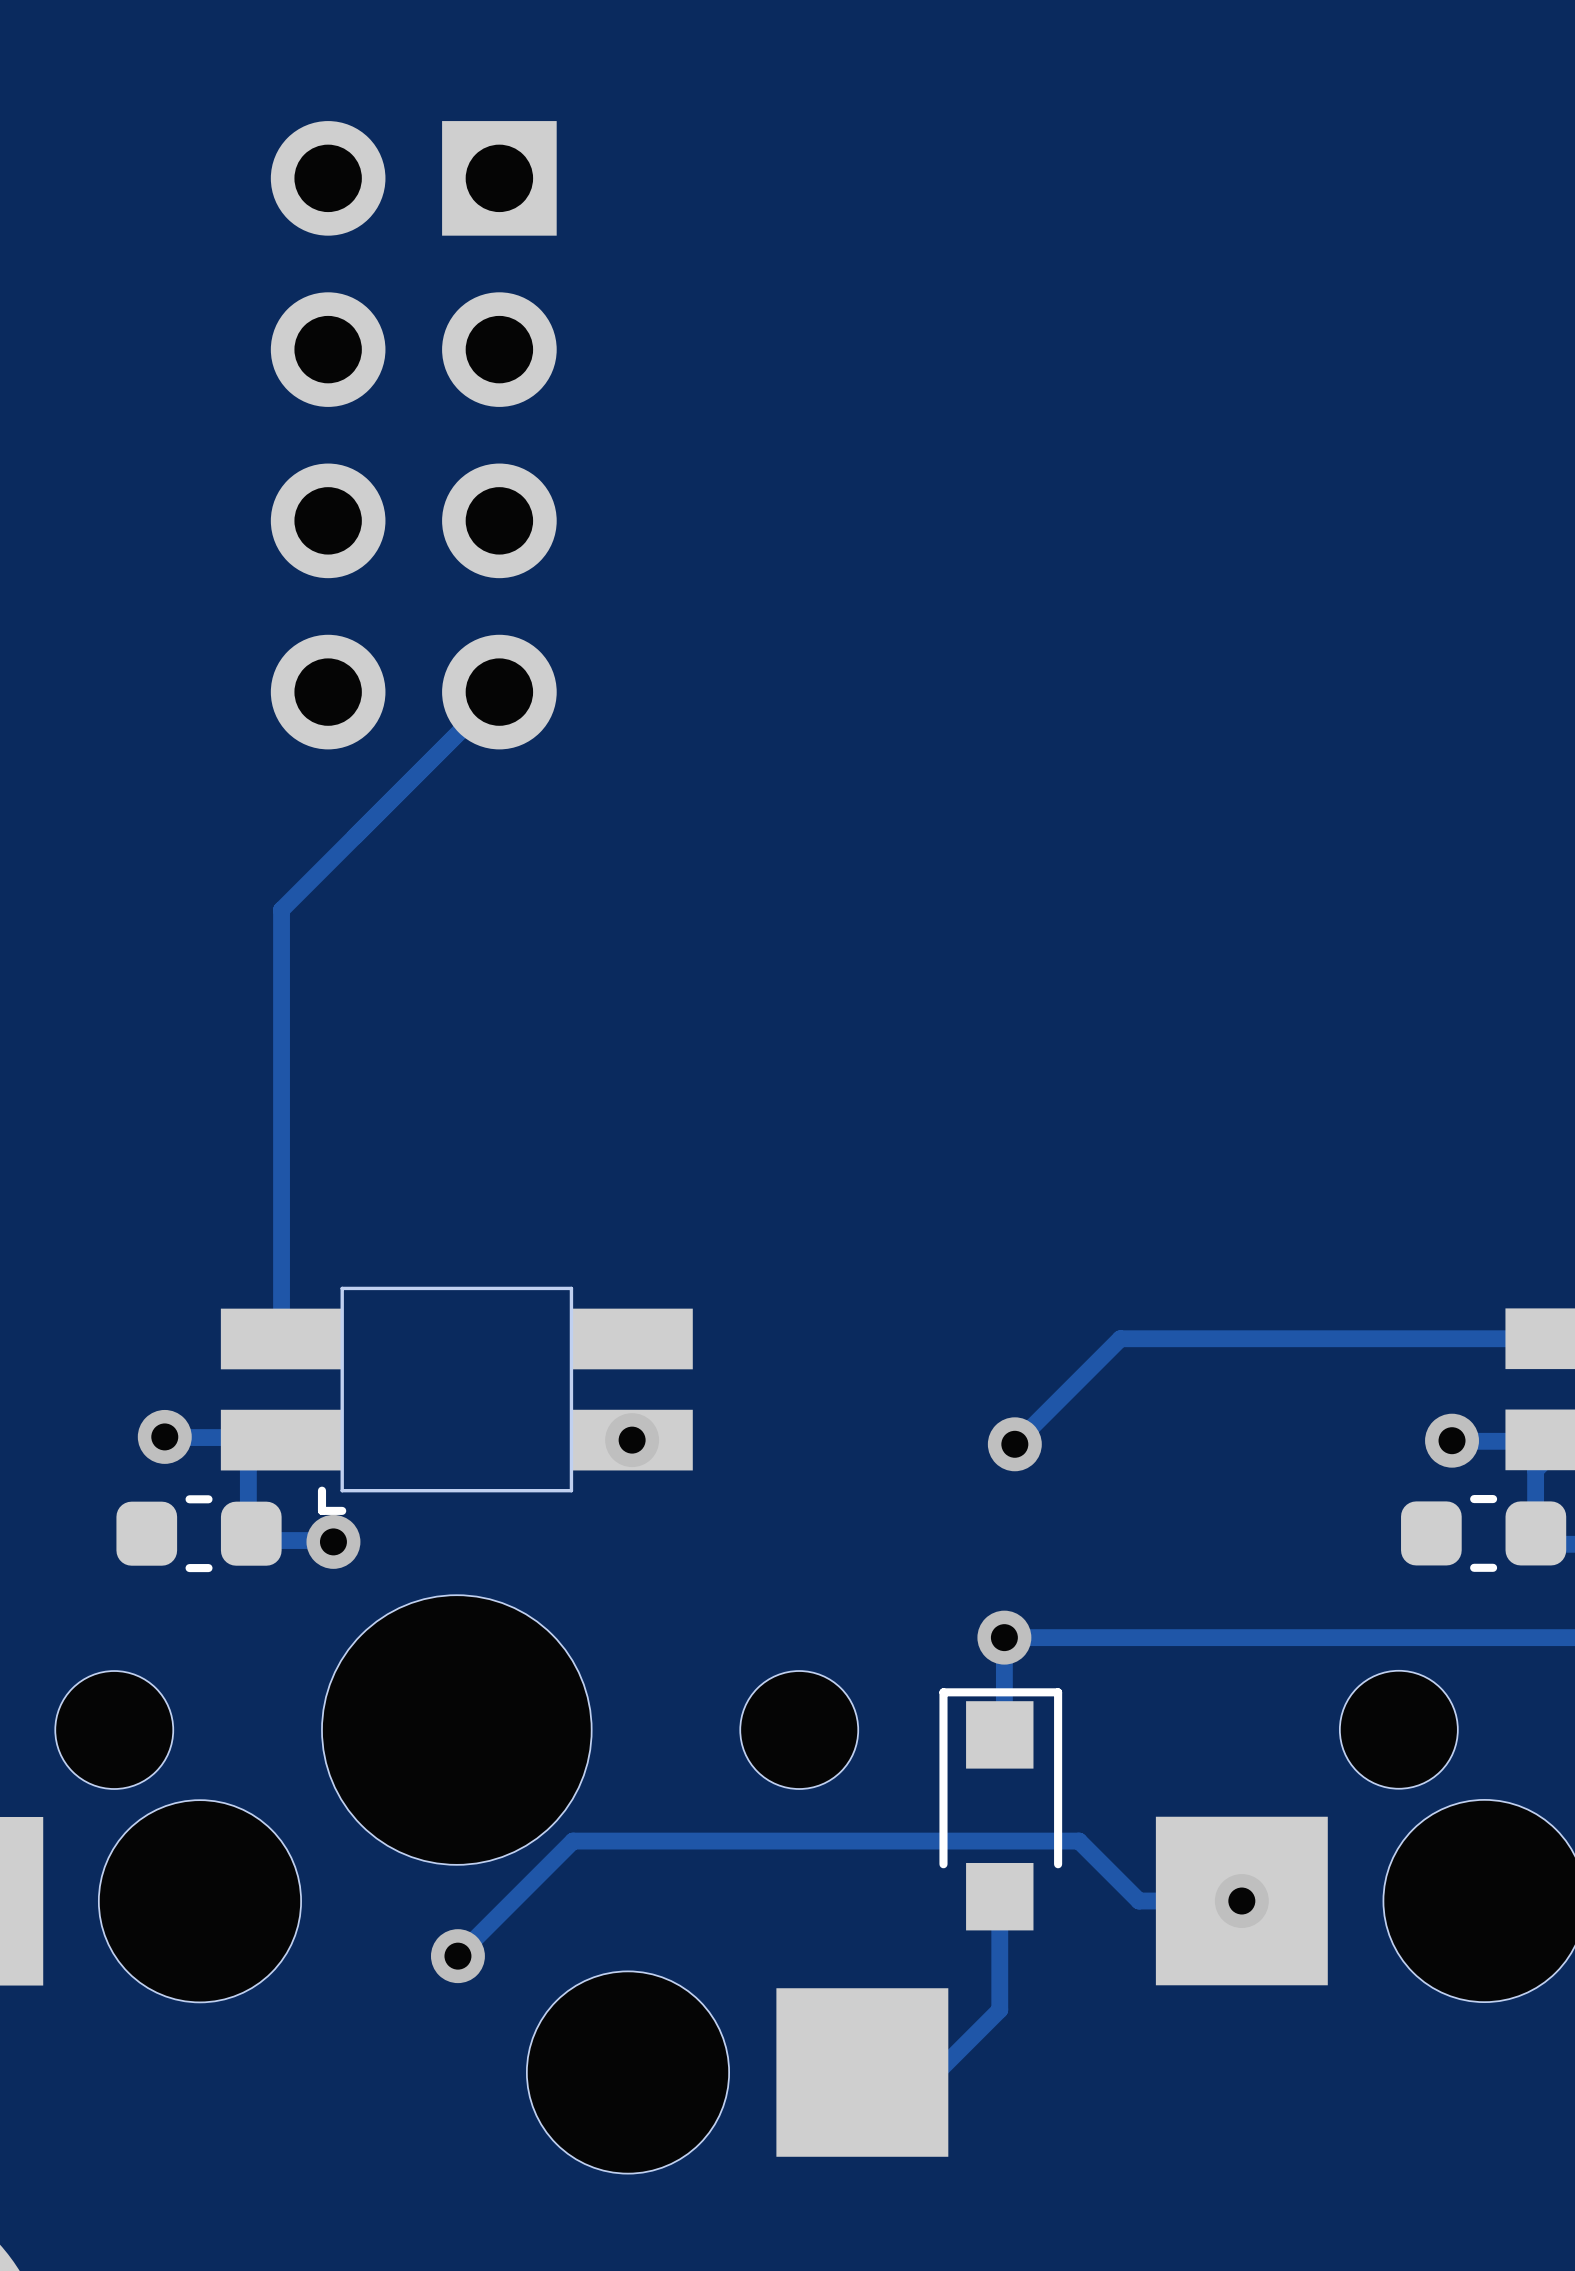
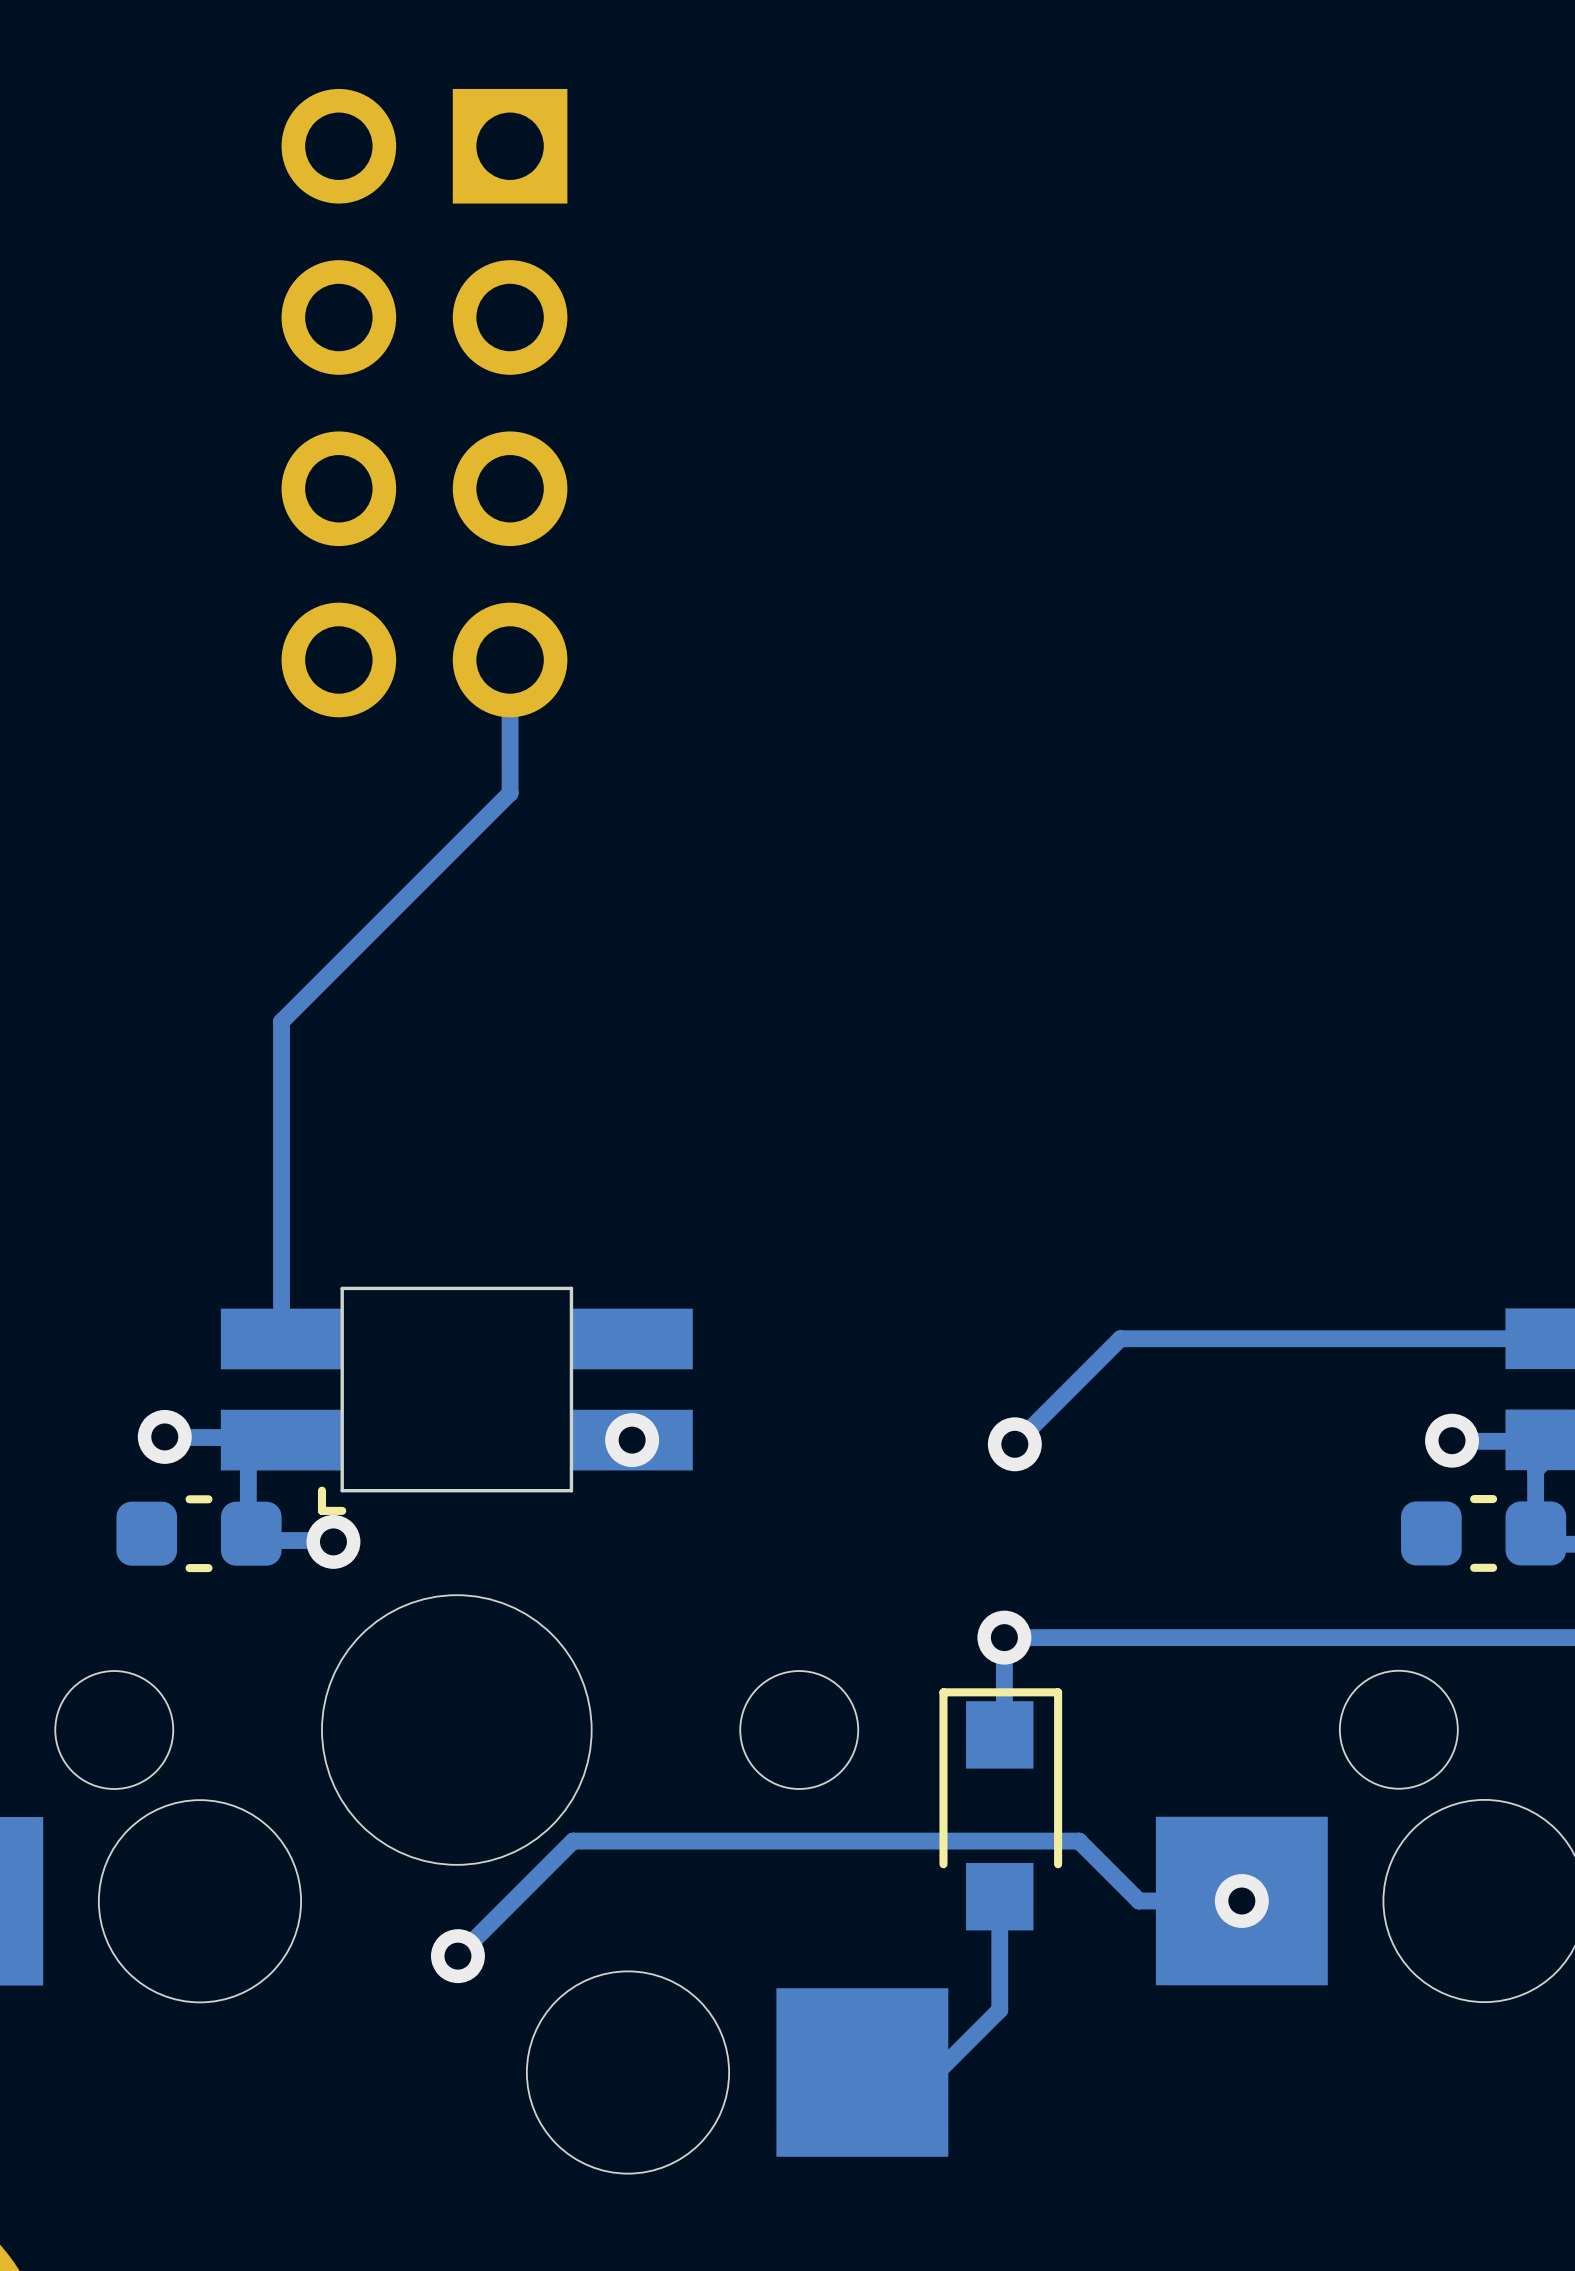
part position: (413, 435) -> (424, 403)
track: (499, 692) (281, 909) (281, 1021) -> (510, 659) (510, 793) (281, 1021)

